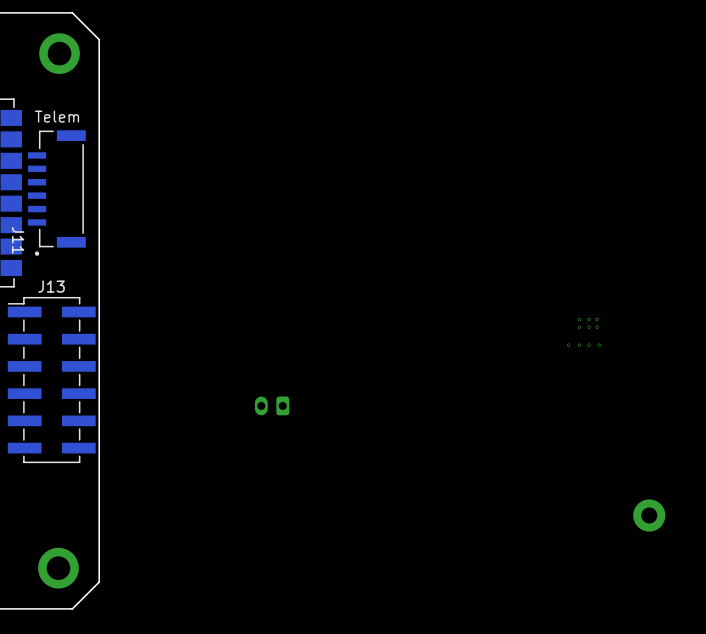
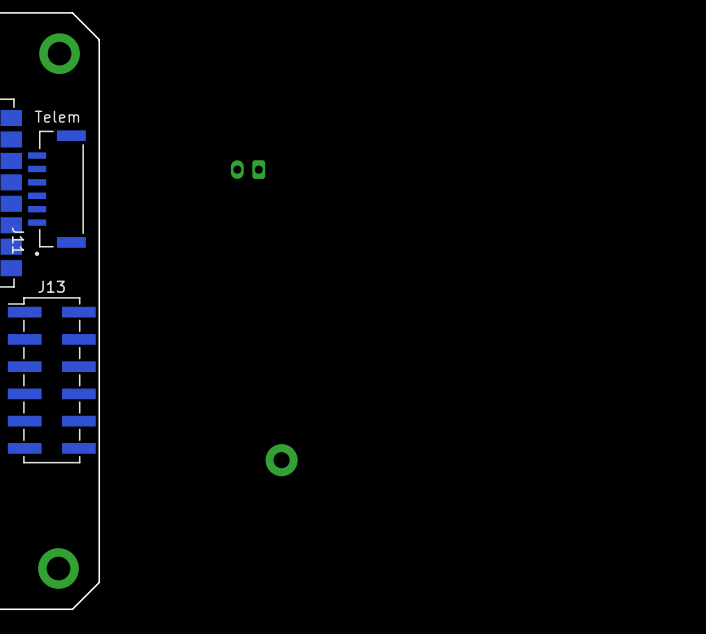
part: (584, 332) -> none
part position: (272, 405) -> (248, 169)
part: none -> (281, 460)
part: (649, 515) -> none

